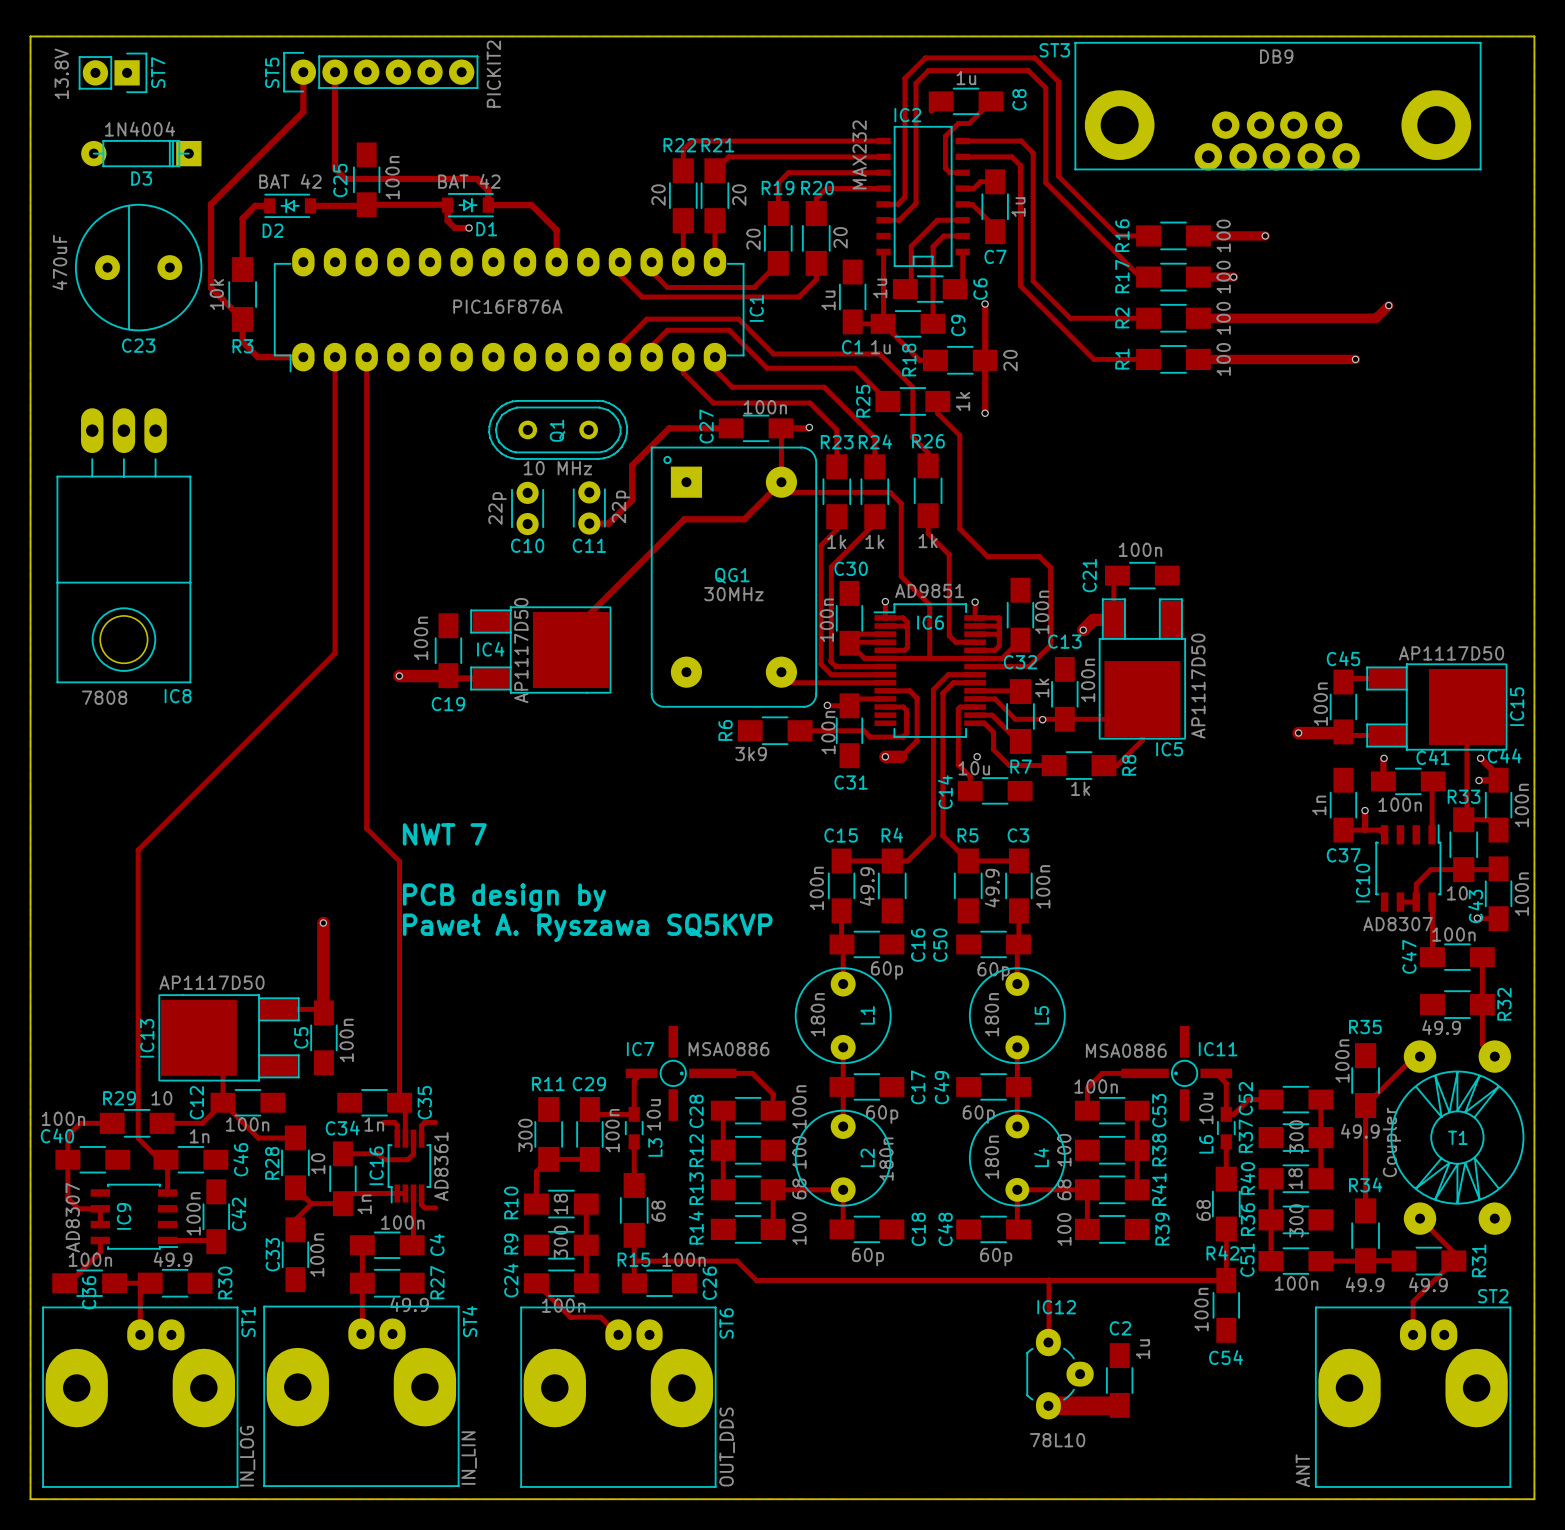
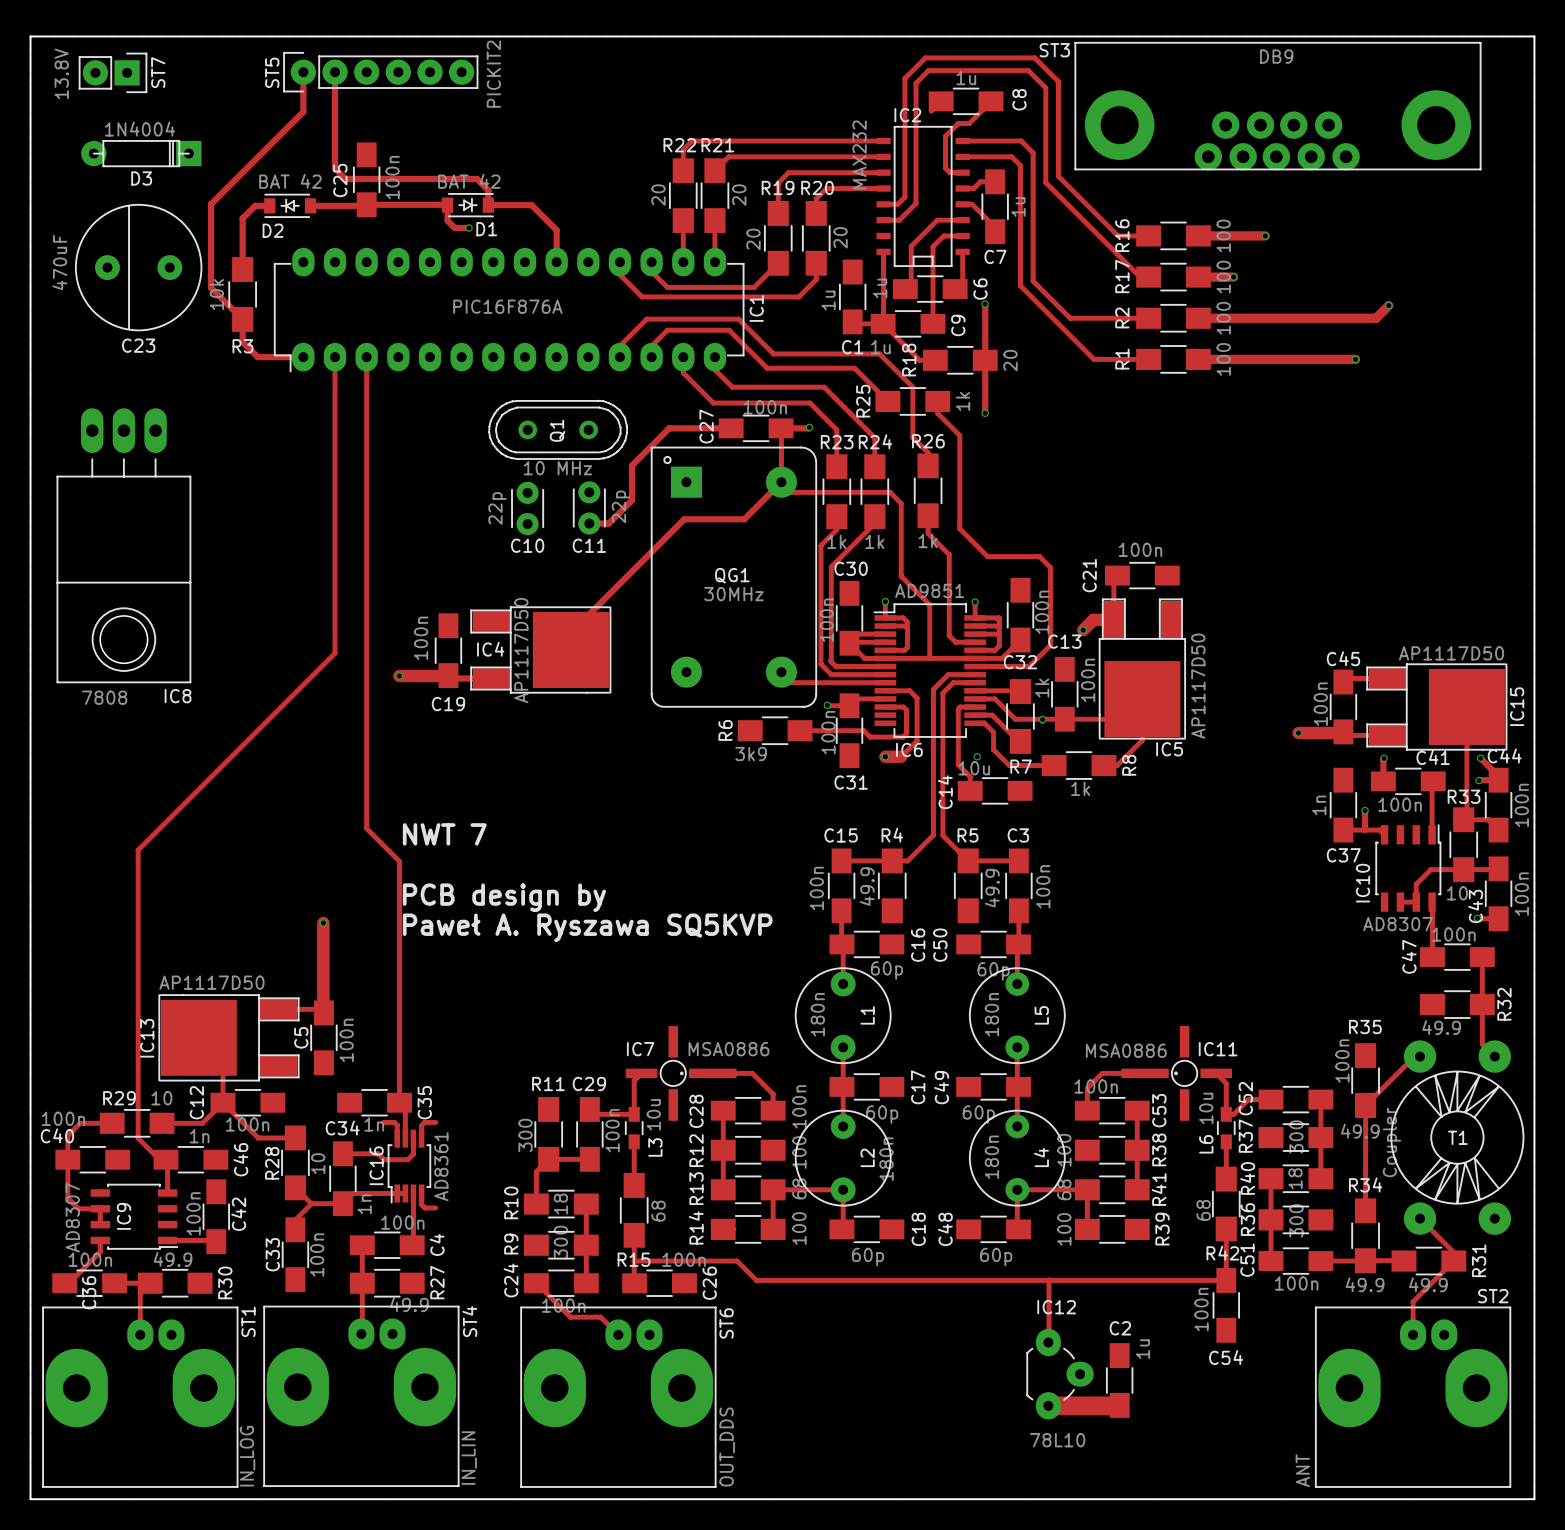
IC6 name position: IC6 (930, 622) -> IC6 (909, 749)

